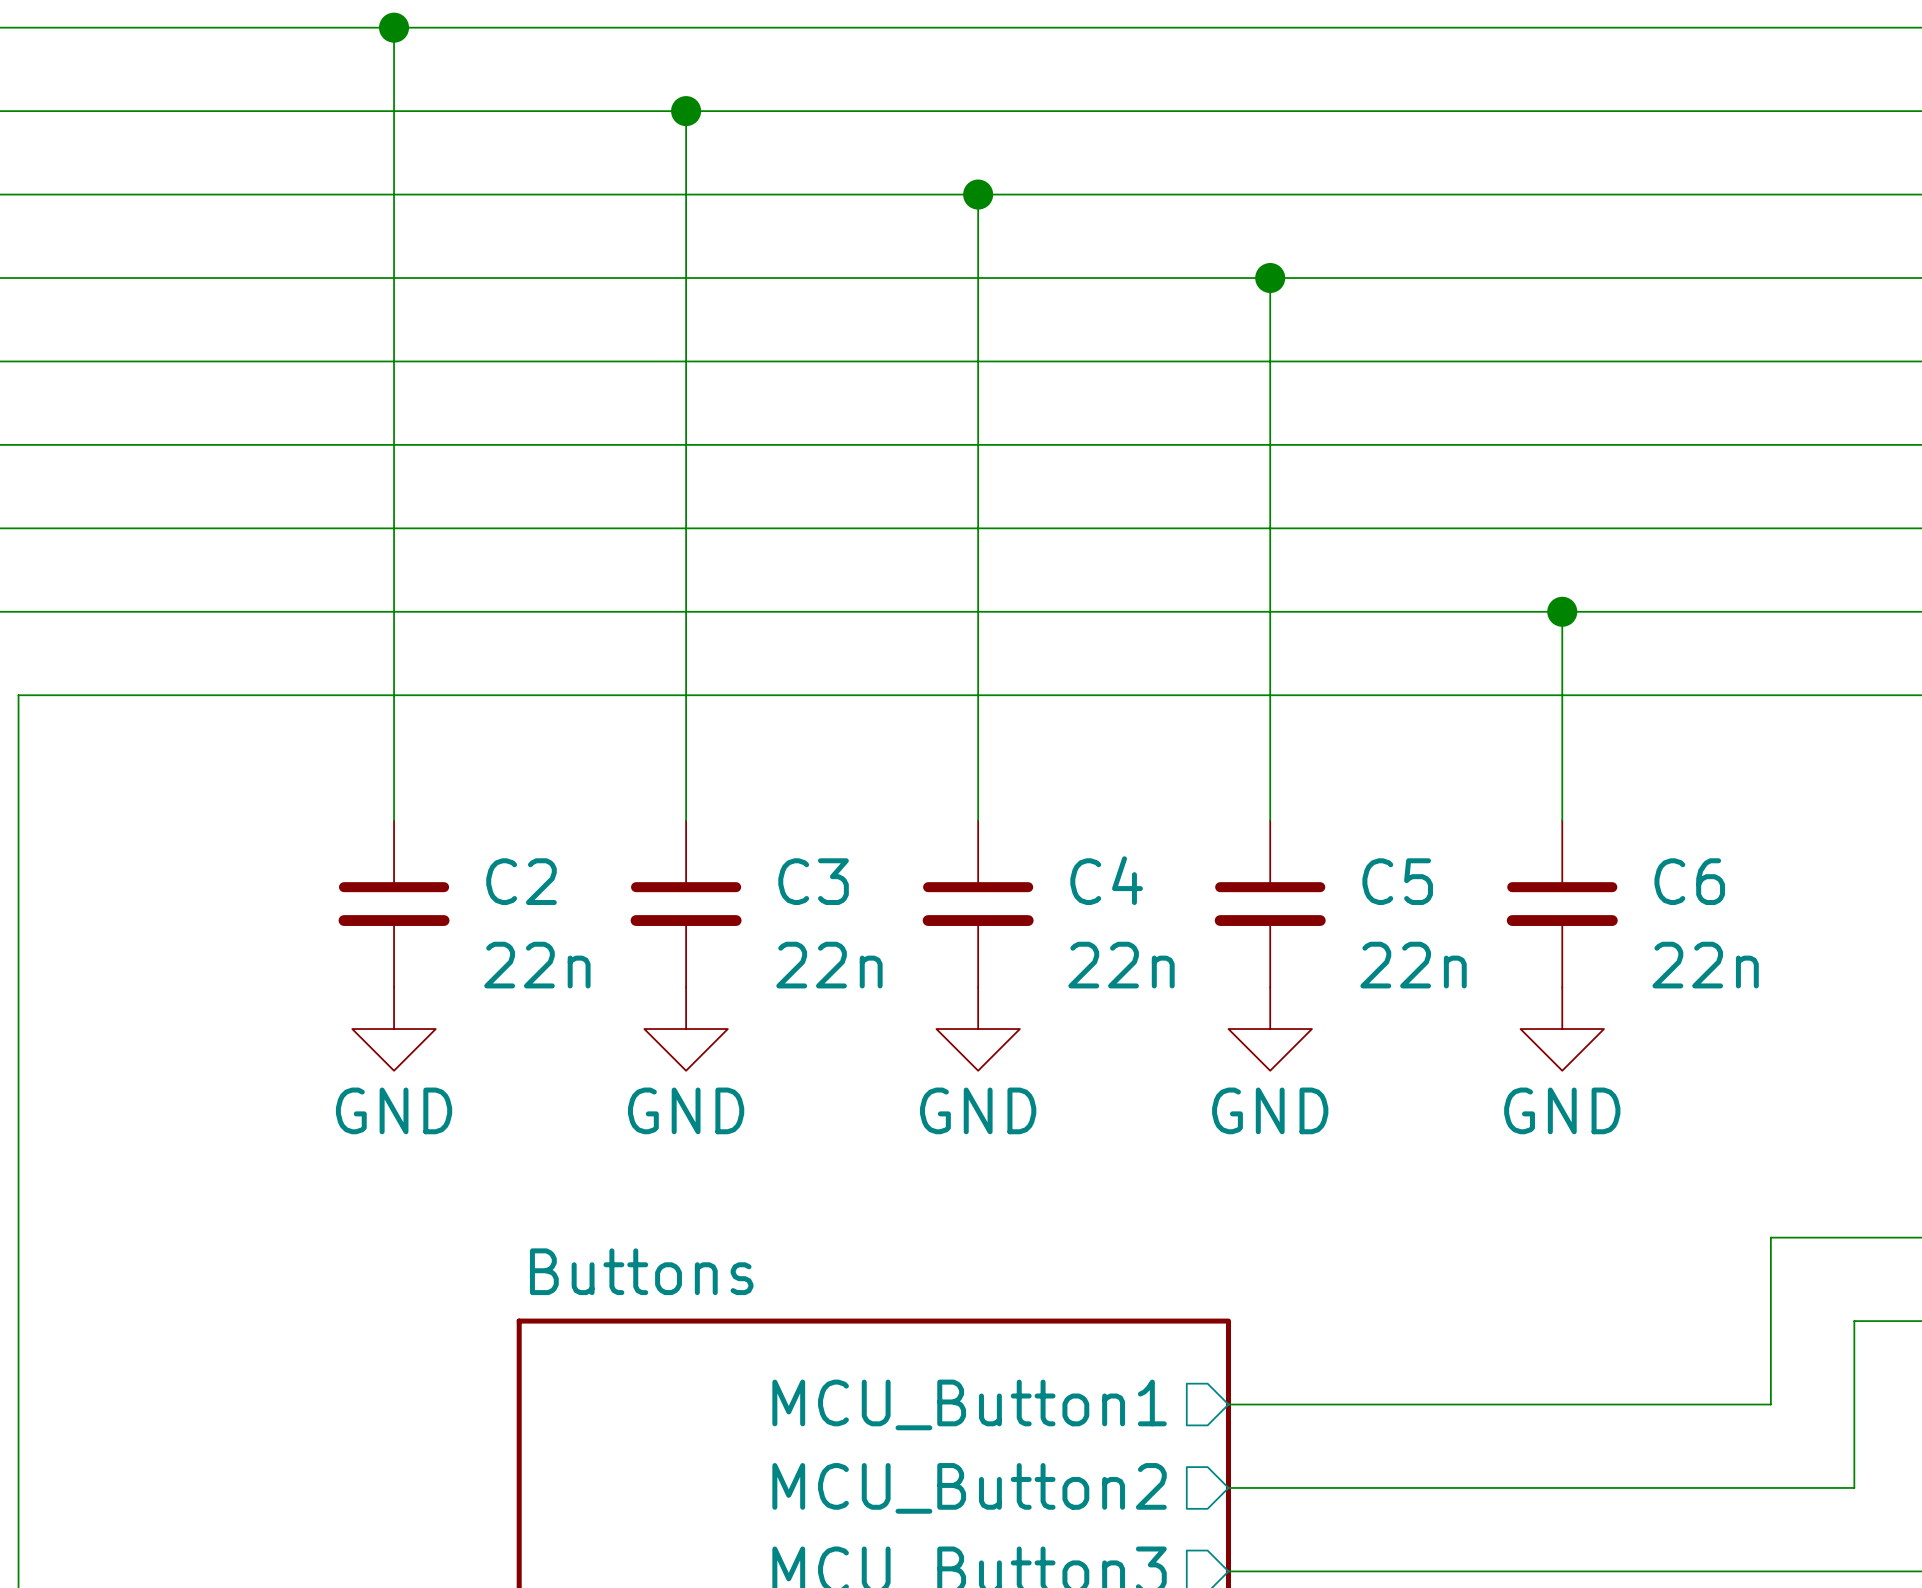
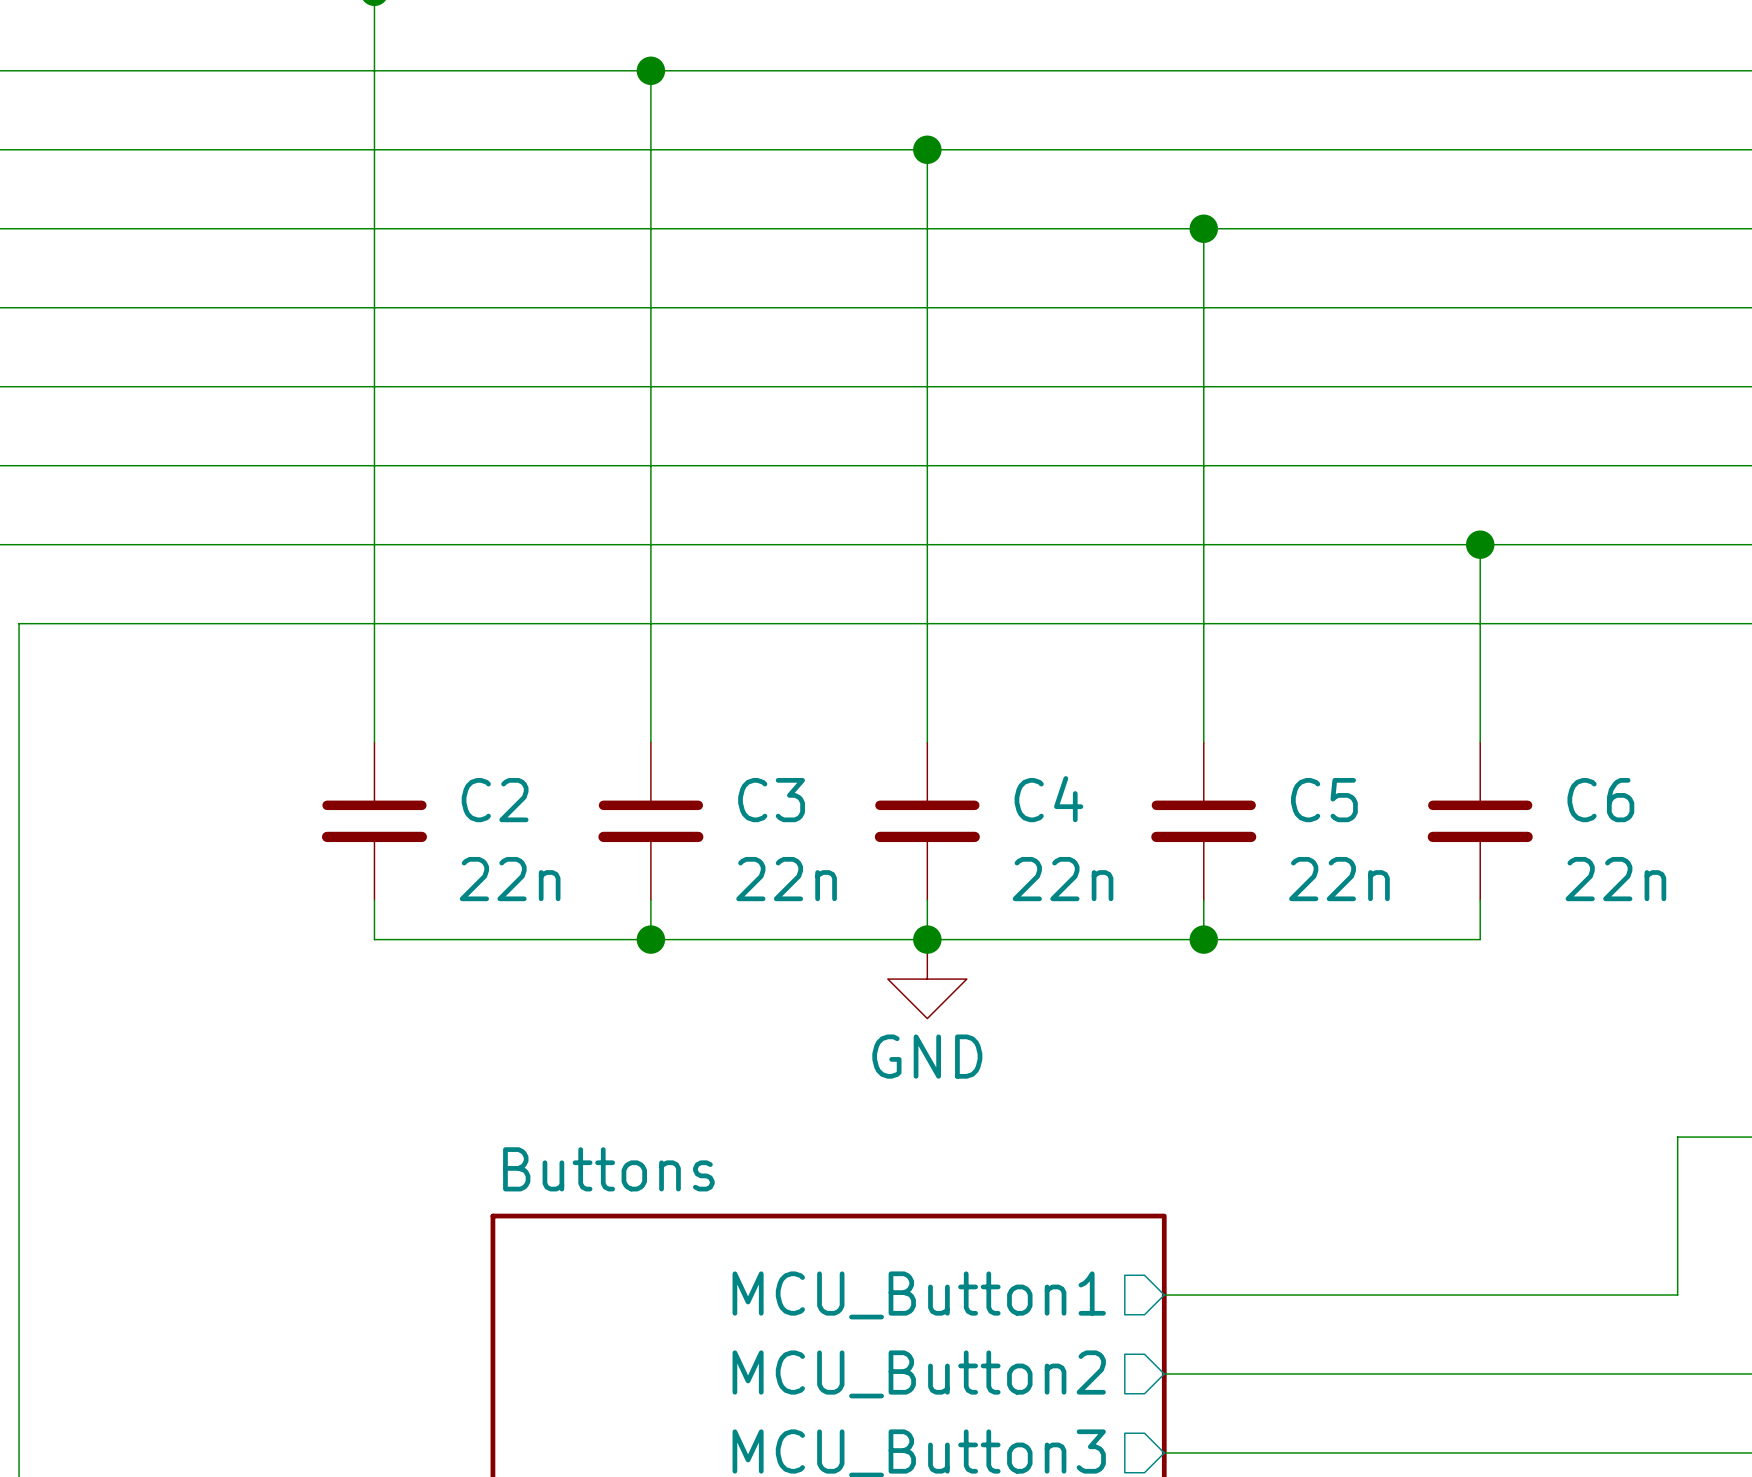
wire: none -> (374, 900) (374, 939) (1480, 939) (1480, 900)
power symbol: GND (394, 1029) -> none
power symbol: GND (686, 1029) -> none
junction: none -> (650, 939)
power symbol position: GND (978, 1029) -> GND (927, 979)
junction: none -> (927, 939)
power symbol: GND (1270, 1029) -> none
junction: none -> (1203, 939)
power symbol: GND (1562, 1029) -> none

